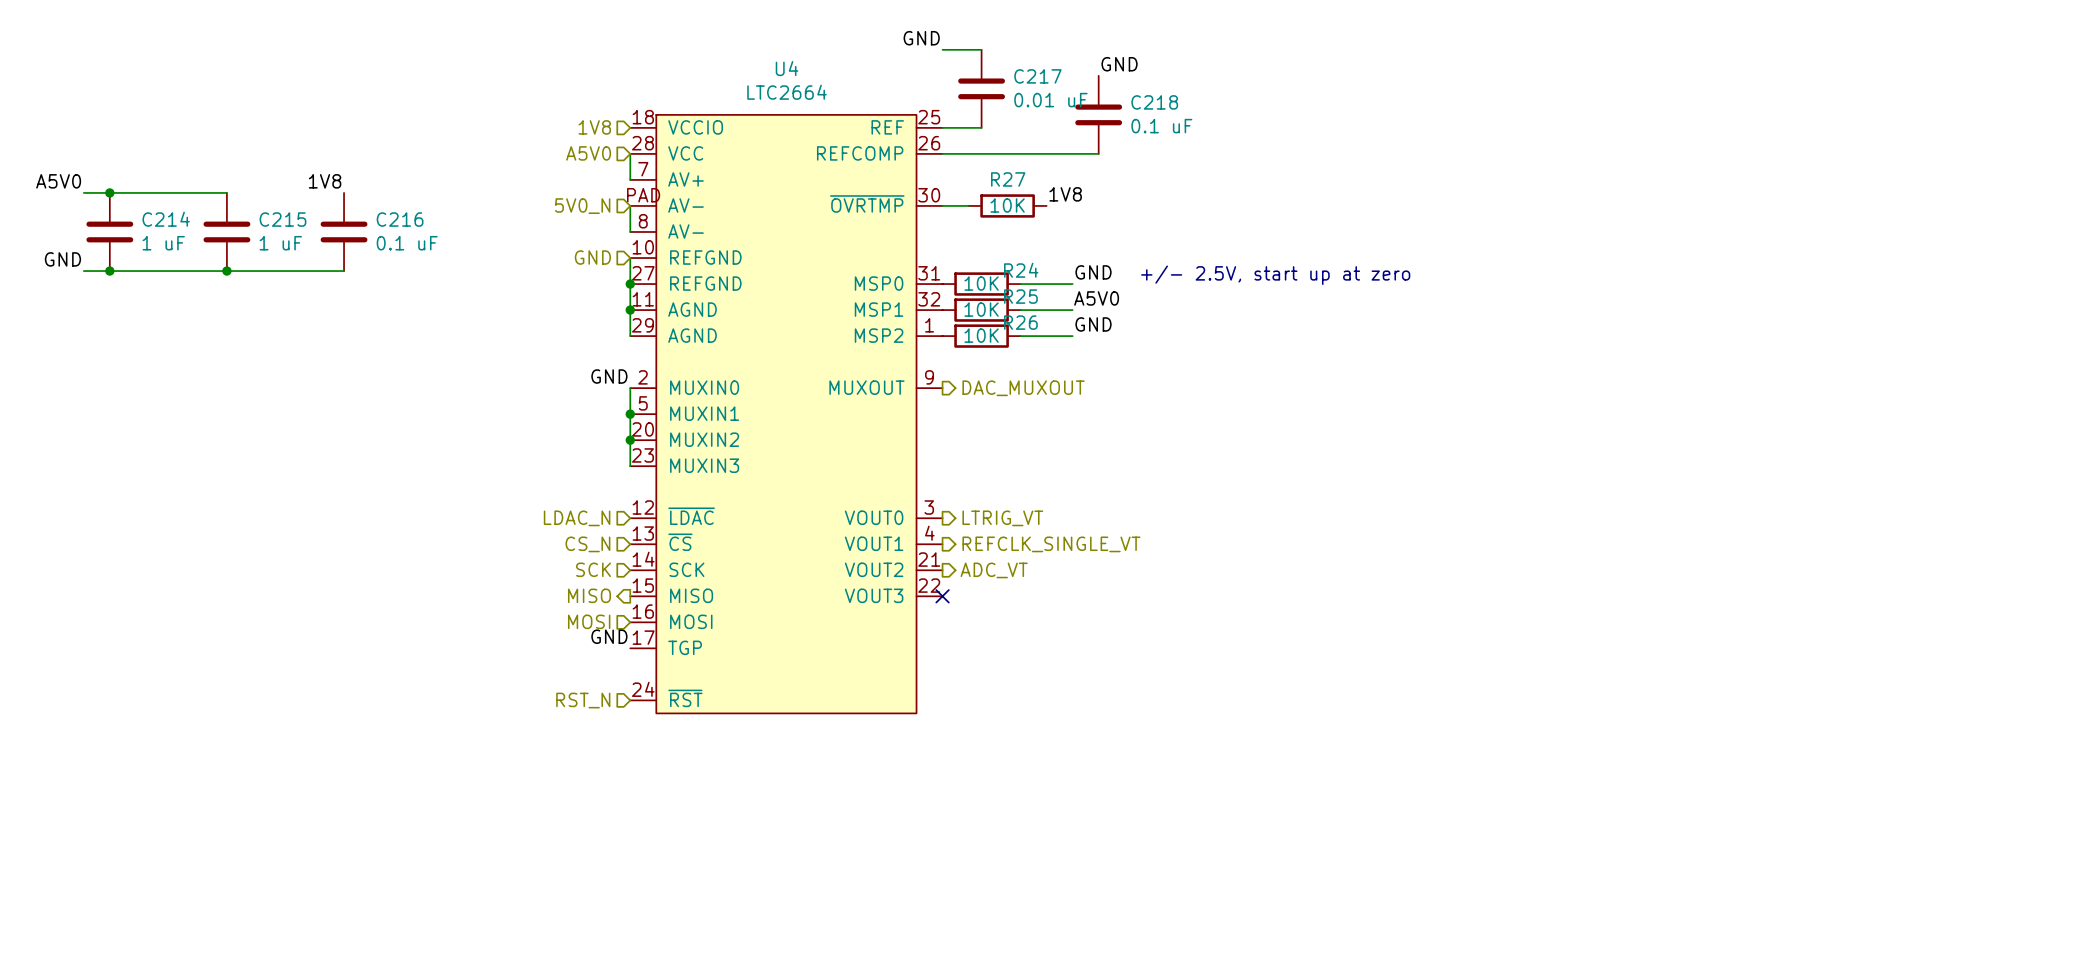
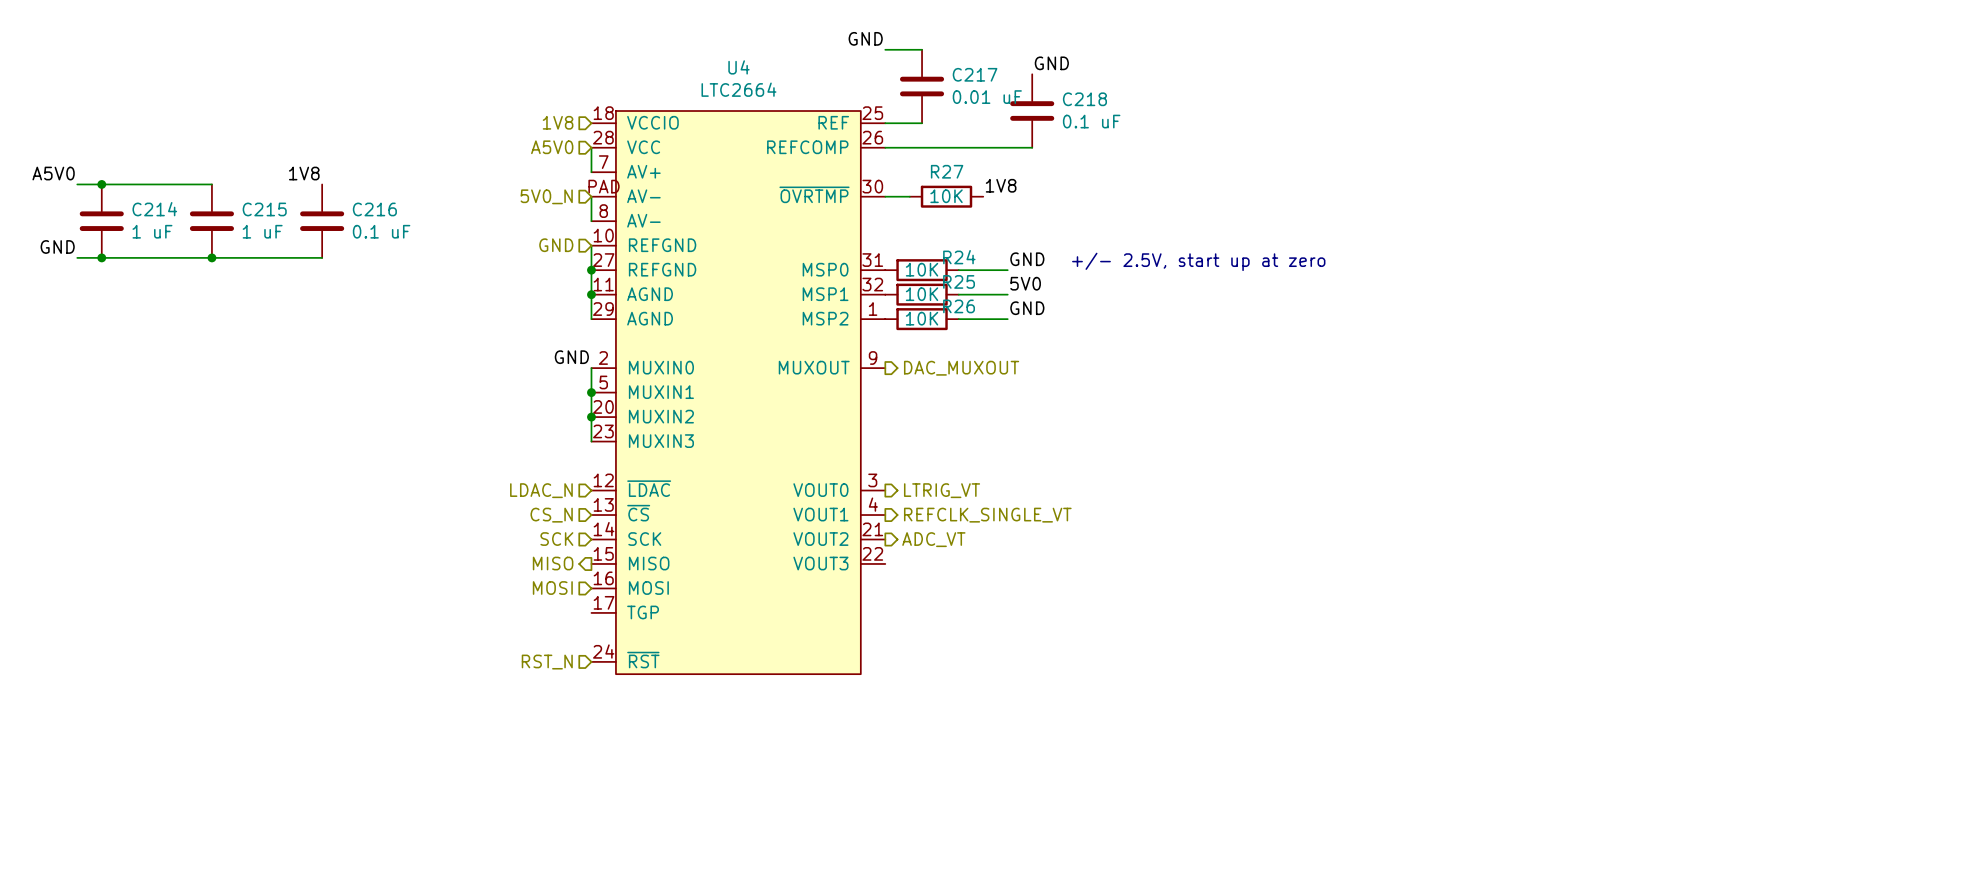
label: A5V0 (1096, 298) -> 5V0 (1025, 283)
no-connect mark: (942, 596) -> none
label: GND (609, 636) -> none

